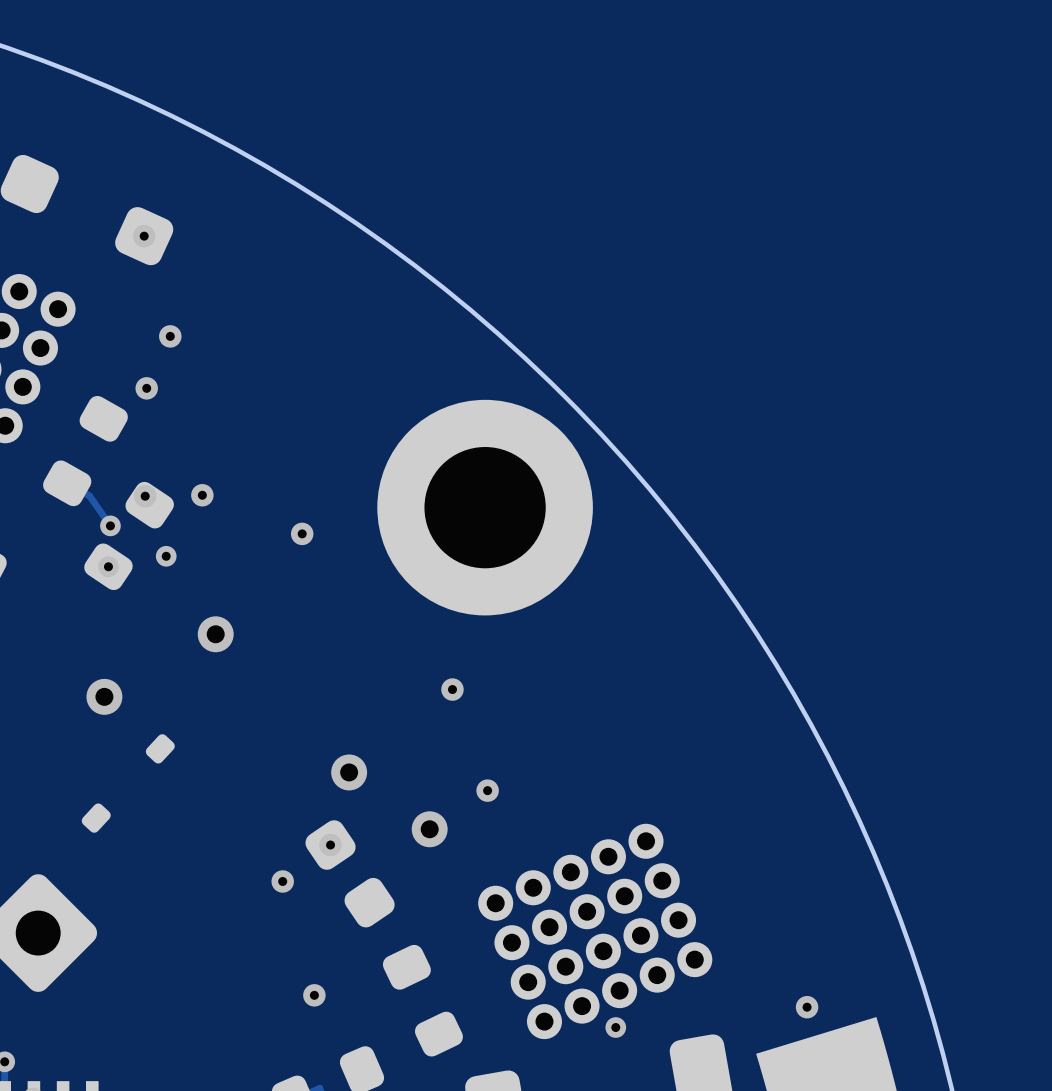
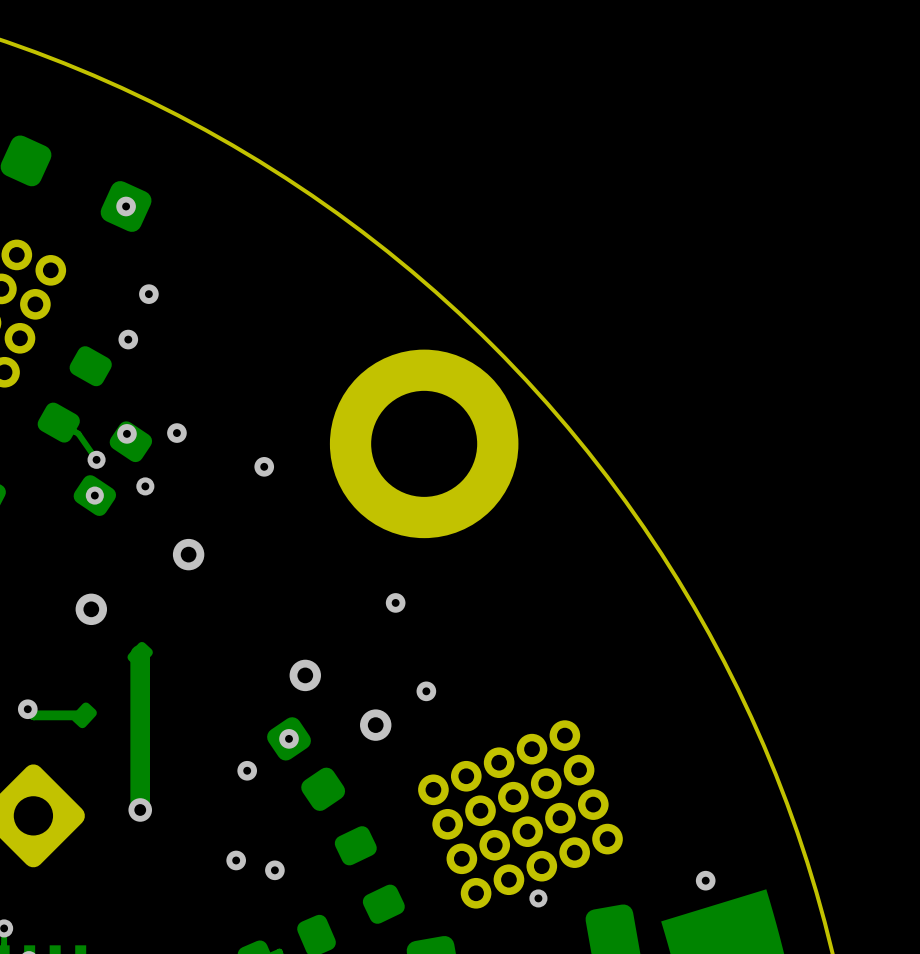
track: none -> (140, 654) (140, 809)
track: none -> (27, 709) (33, 715) (84, 715)
via: none -> (27, 709)
via: none -> (140, 809)
via: none -> (236, 860)

